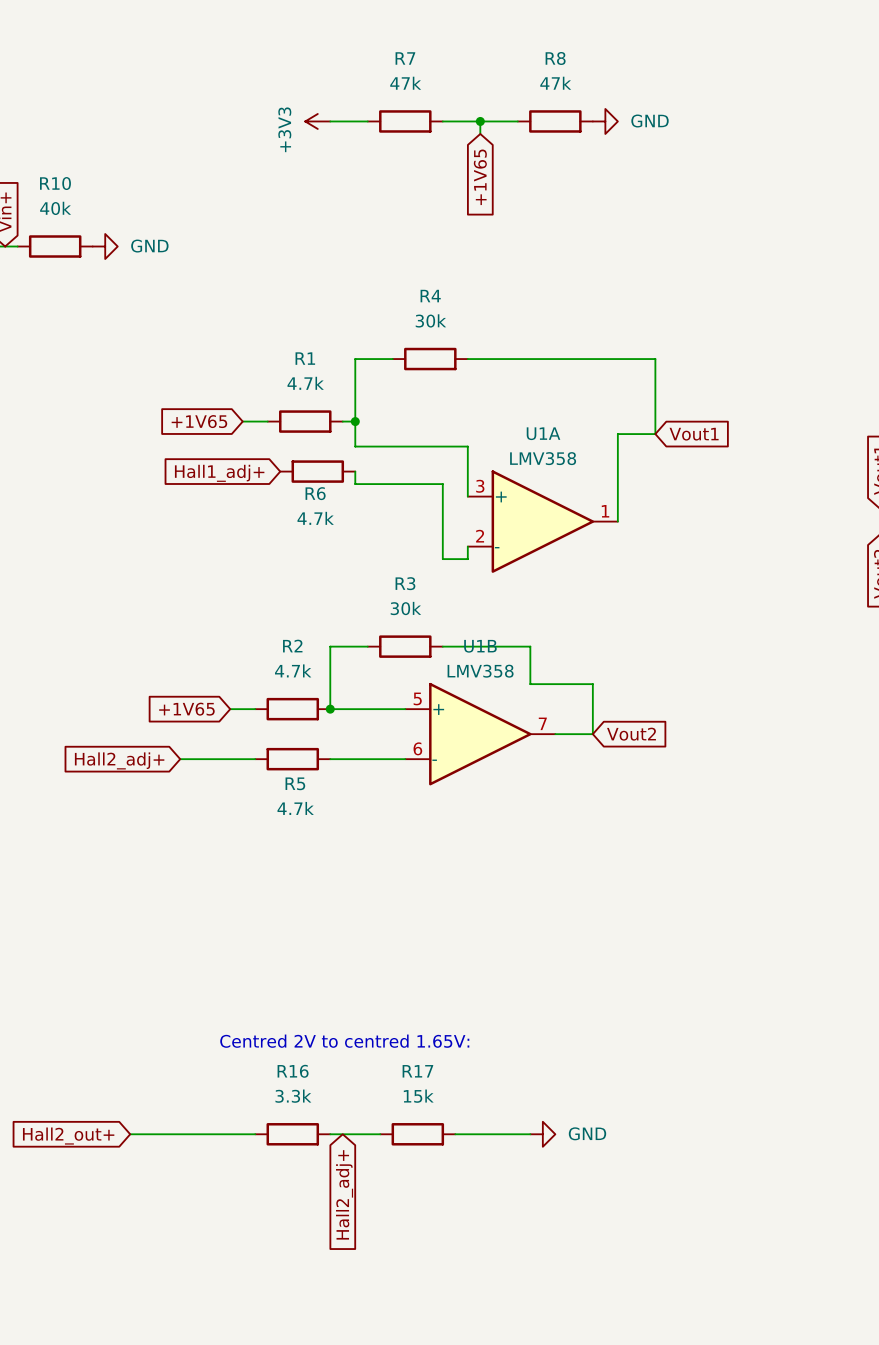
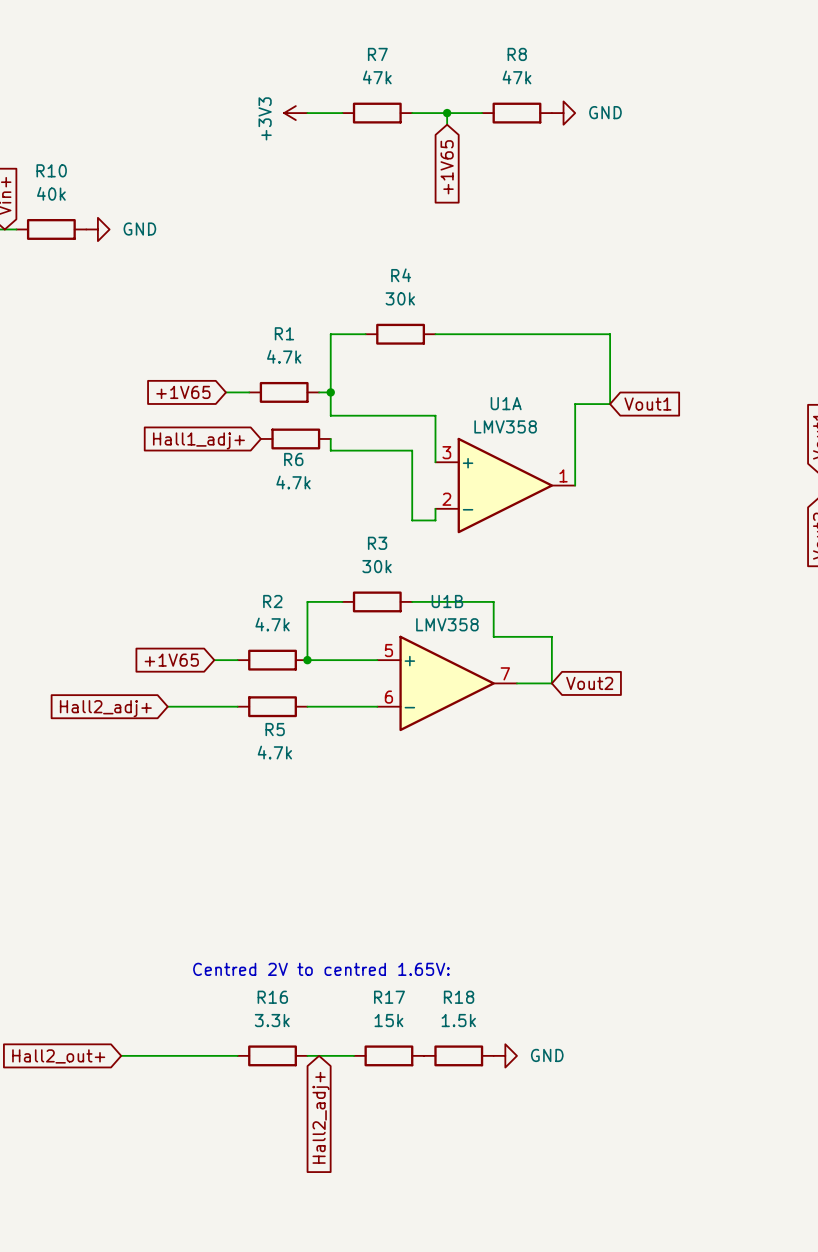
wire: (455, 1134) (530, 1134) -> none
R18: none -> 1.5k (458, 1055)

